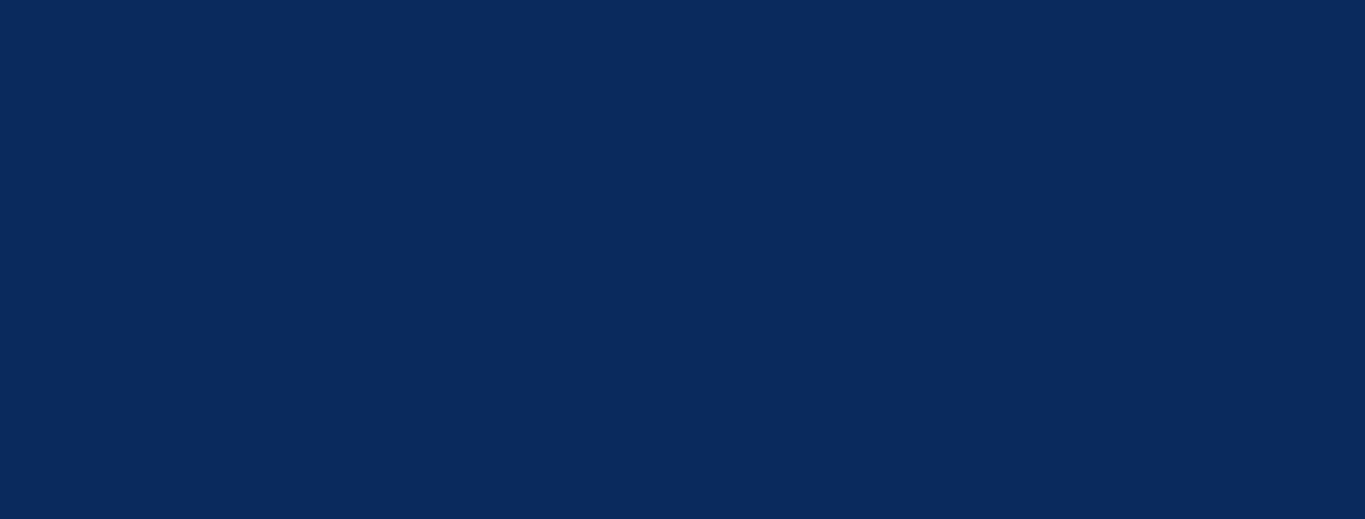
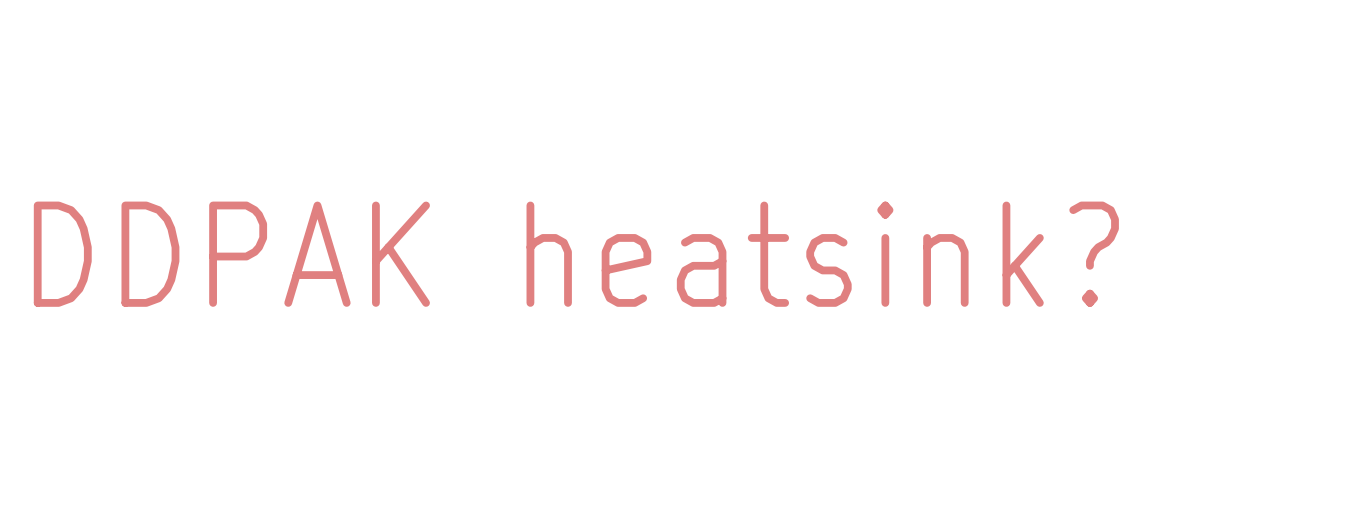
text: none -> DDPAK heatsink? (576, 254)

